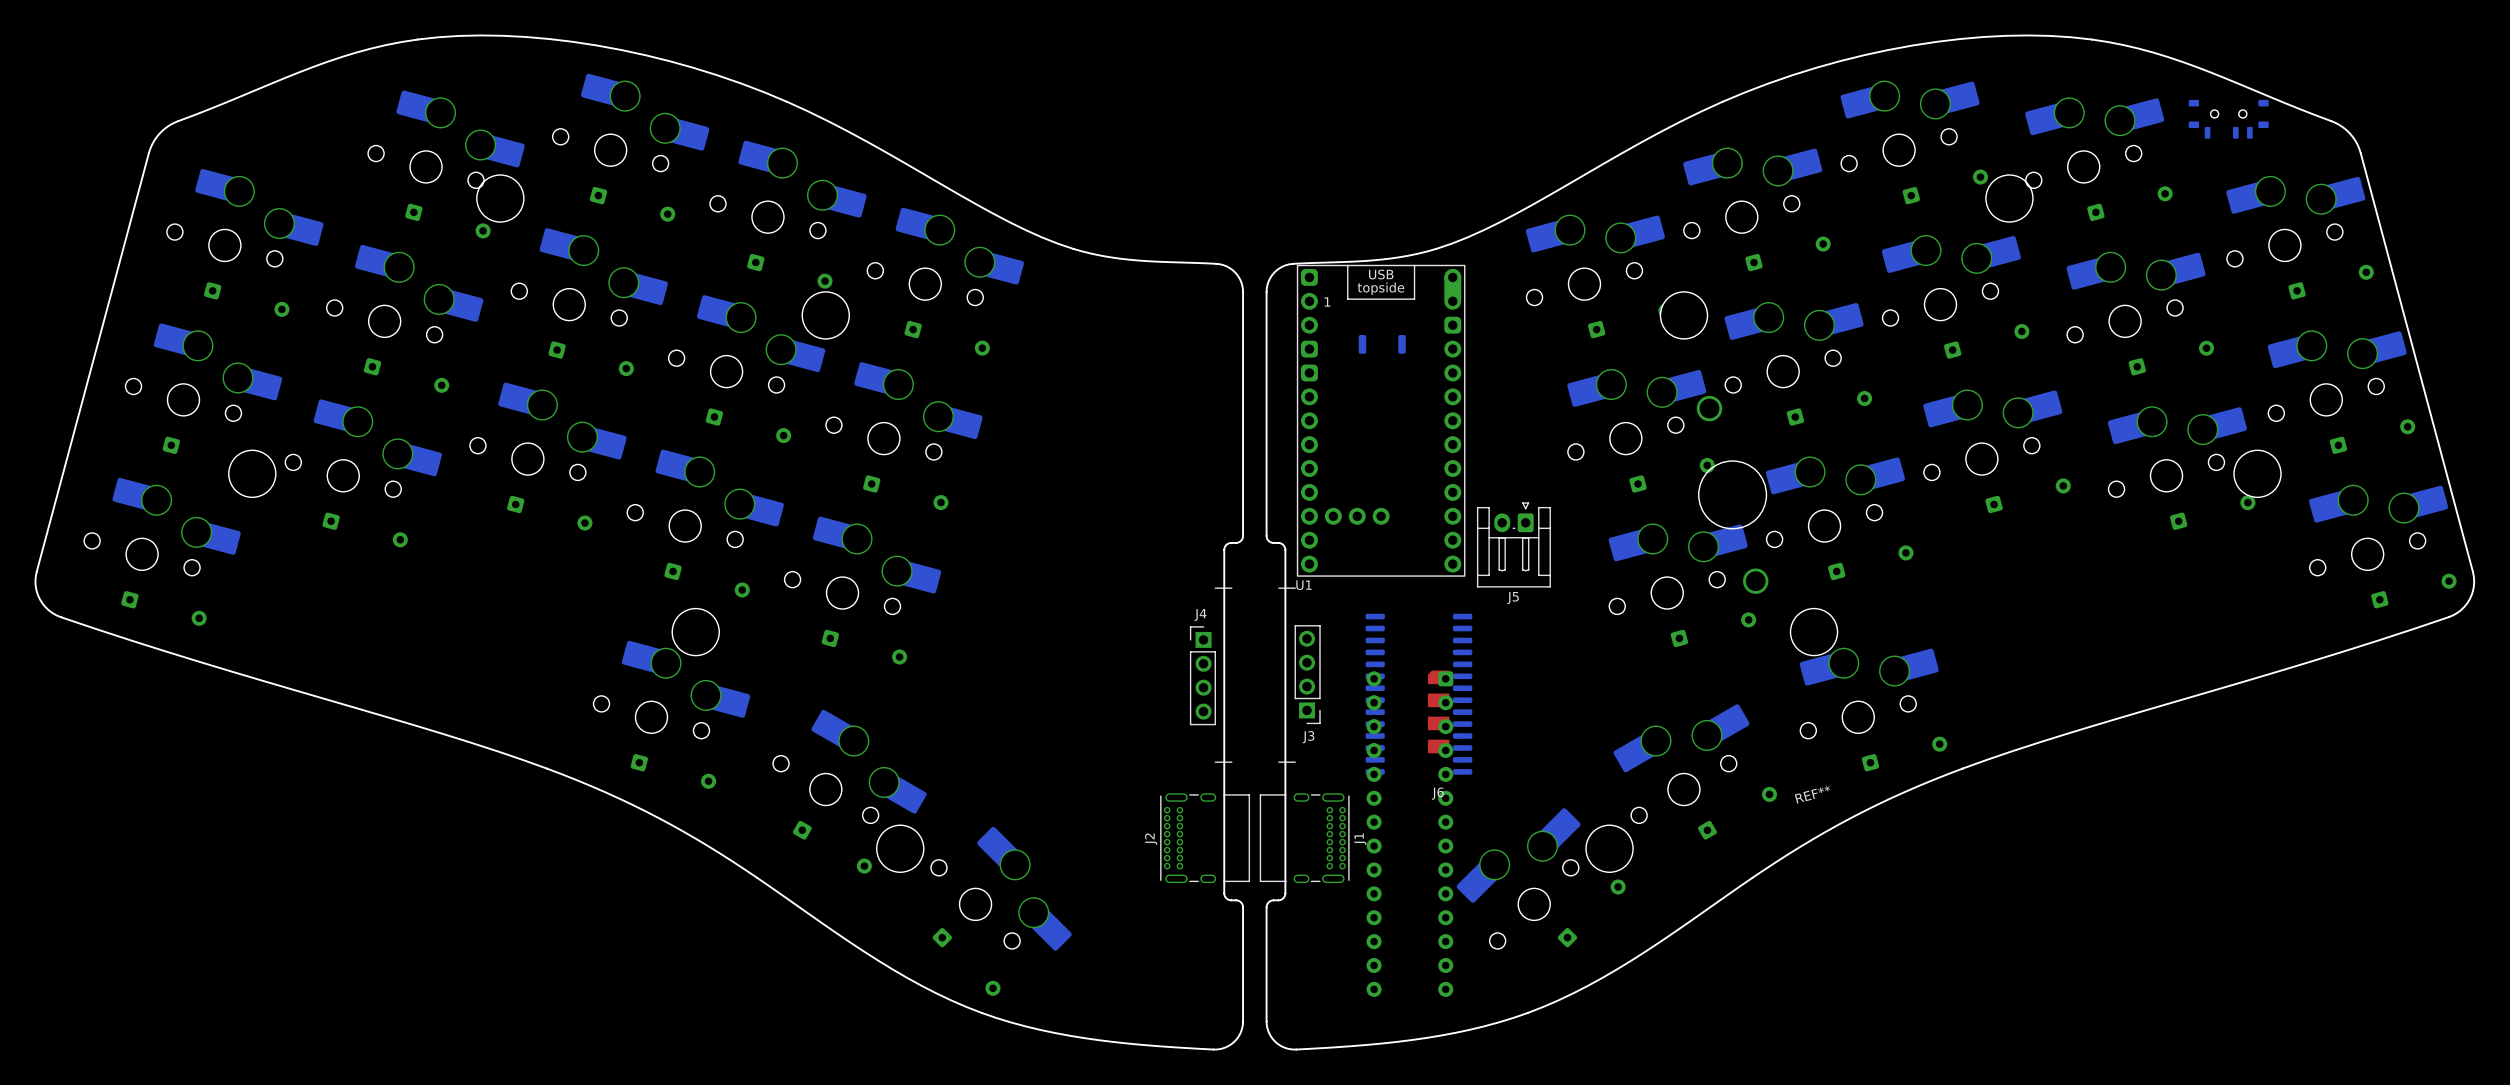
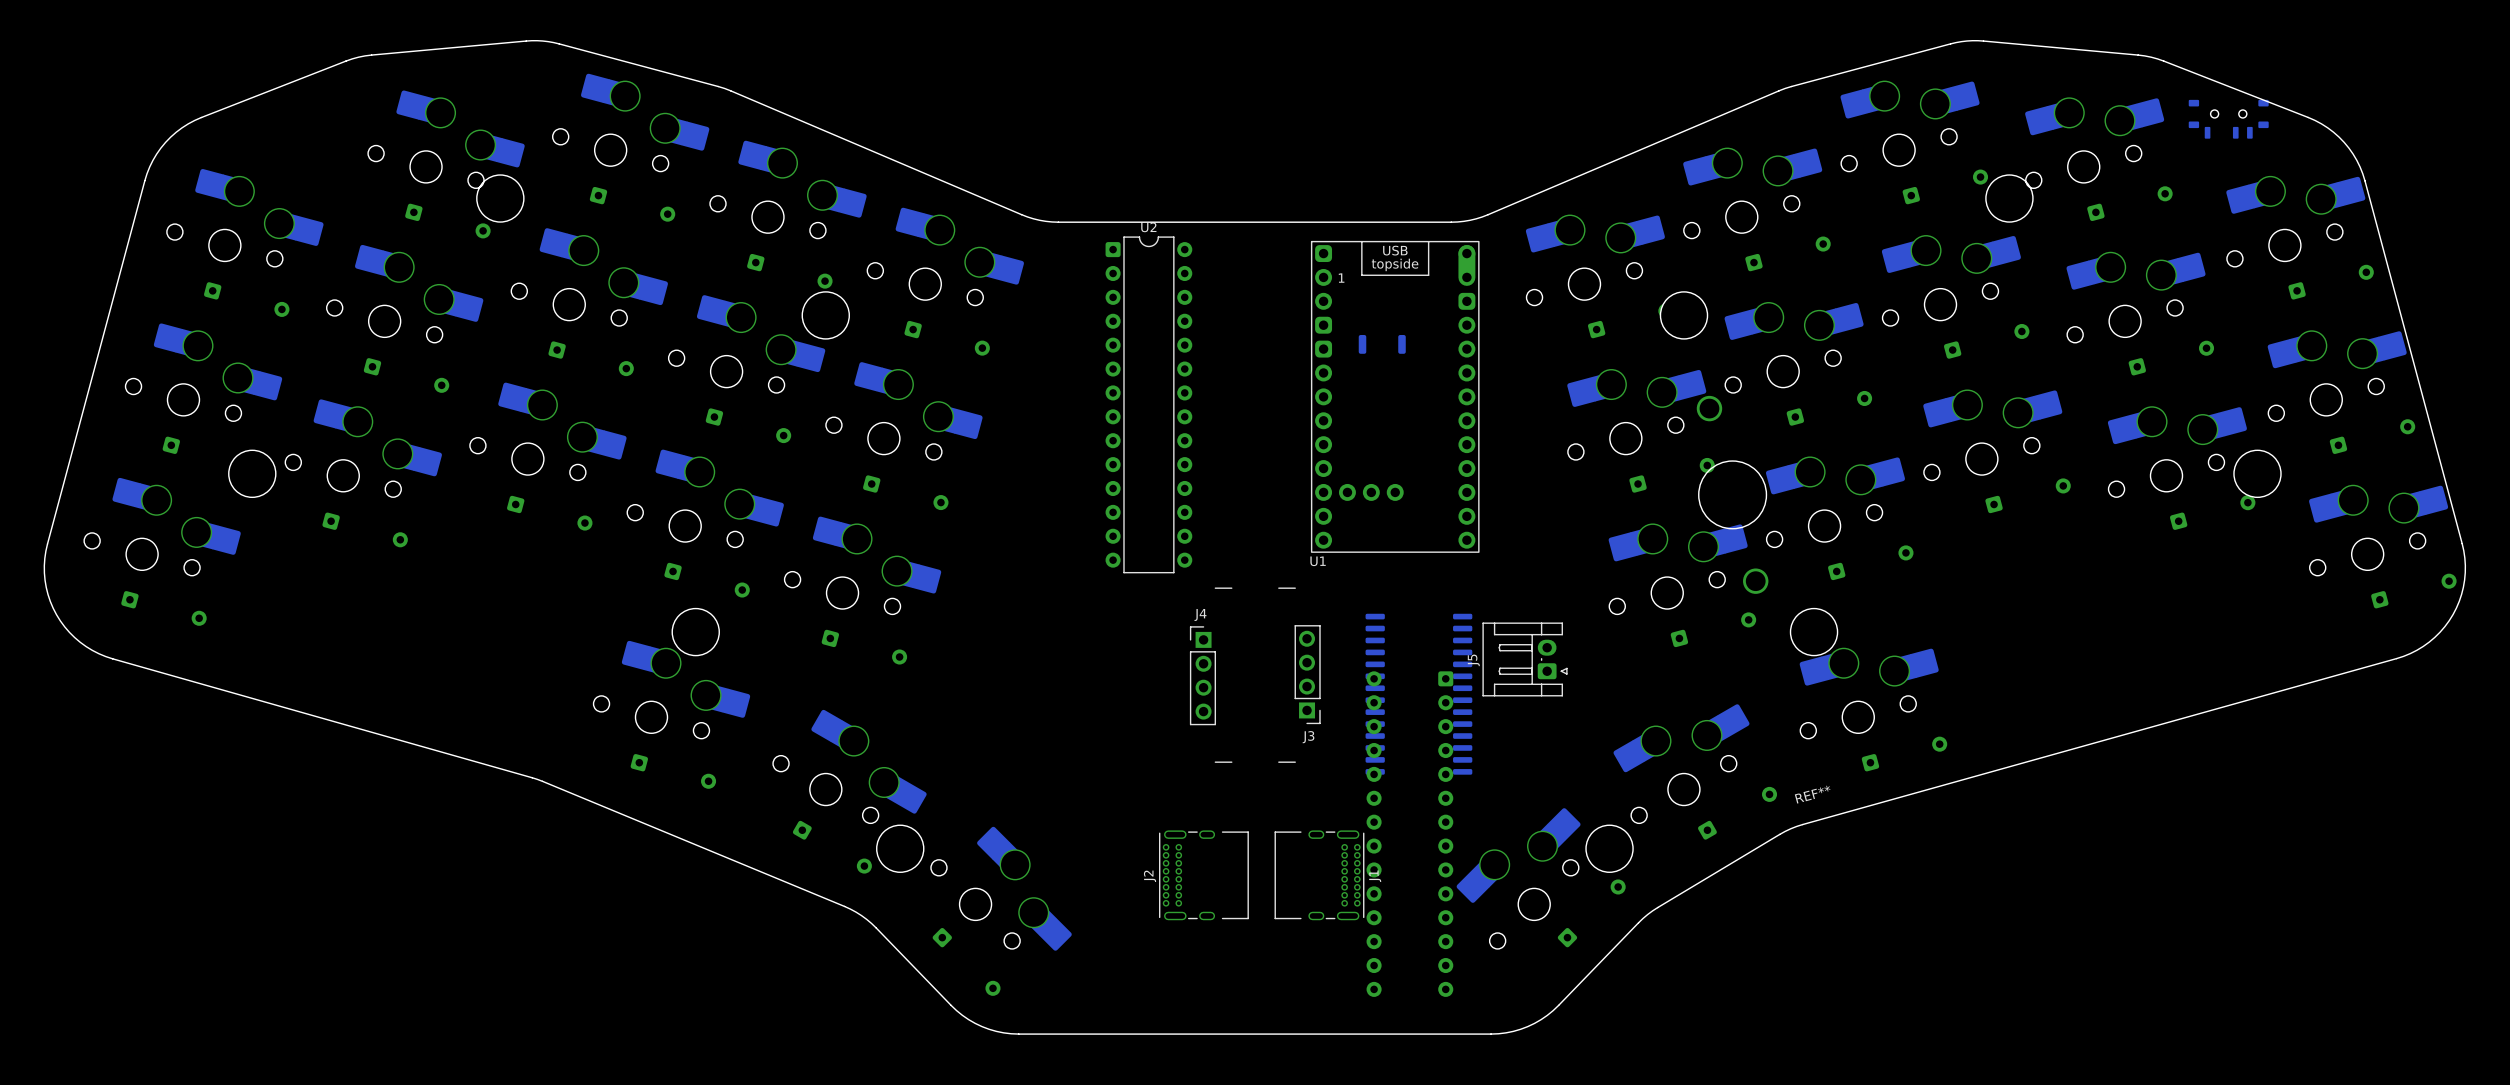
board edge: (417, 39) (481, 35) (549, 39) (621, 49) (693, 67) (740, 83) (807, 111) (867, 141) (993, 213) (1057, 243) (1092, 253) (1119, 258) (1220, 264) (1229, 268) (1237, 275) (1243, 292) (1243, 535) (1239, 541) (1227, 544) (1224, 549) (1224, 893) (1227, 898) (1239, 901) (1243, 907) (1242, 1024) (1238, 1036) (1231, 1043) (1223, 1048) (1213, 1049) (1113, 1041) (1039, 1029) (981, 1012) (951, 1000) (906, 977) (849, 942) (708, 846) (646, 811) (591, 786) (472, 743) (96, 629) (56, 615) (45, 606) (36, 590) (36, 571) (148, 153) (154, 140) (162, 130) (174, 122) (312, 67) (370, 48) (417, 39) -> none
board edge: (2091, 39) (2028, 35) (1959, 39) (1888, 49) (1816, 67) (1768, 83) (1701, 111) (1642, 141) (1516, 213) (1451, 243) (1417, 253) (1390, 258) (1289, 264) (1279, 268) (1272, 275) (1266, 292) (1266, 535) (1270, 542) (1282, 544) (1285, 549) (1285, 893) (1281, 899) (1269, 901) (1266, 907) (1266, 1024) (1269, 1034) (1277, 1043) (1286, 1048) (1296, 1049) (1396, 1041) (1470, 1029) (1527, 1012) (1558, 1000) (1603, 977) (1659, 942) (1801, 846) (1863, 811) (1917, 786) (2037, 743) (2413, 629) (2453, 615) (2464, 606) (2473, 590) (2472, 571) (2360, 153) (2355, 140) (2346, 130) (2335, 122) (2197, 67) (2139, 48) (2091, 39) -> none
board edge: none -> (526, 41) (371, 55) (352, 58) (194, 120) (176, 132) (165, 142) (152, 160) (144, 180) (47, 544) (44, 565) (45, 580) (53, 608) (60, 621) (74, 637) (92, 650) (105, 656) (537, 779) (844, 906) (871, 923) (956, 1010) (975, 1023) (996, 1031) (1018, 1034) (1491, 1034) (1520, 1029) (1534, 1023) (1553, 1010) (1647, 914) (1790, 828) (2403, 656) (2423, 646) (2440, 632) (2453, 614) (2461, 594) (2465, 565) (2462, 543) (2364, 180) (2356, 160) (2339, 137) (2315, 120) (2157, 58) (2138, 55) (1983, 41) (1956, 42) (1785, 88) (1488, 214) (1463, 221) (1058, 222) (1039, 220) (1021, 214) (724, 88) (559, 43) (526, 41)
U2: none -> (1148, 404)
U1 position: (1381, 420) -> (1395, 396)
J5 rotation: 0° (1513, 544) -> 90° clockwise (1525, 659)
J5 position: (1513, 544) -> (1525, 659)
J6: (1438, 711) -> none
J2 position: (1205, 838) -> (1203, 875)
J1 position: (1304, 838) -> (1319, 875)

